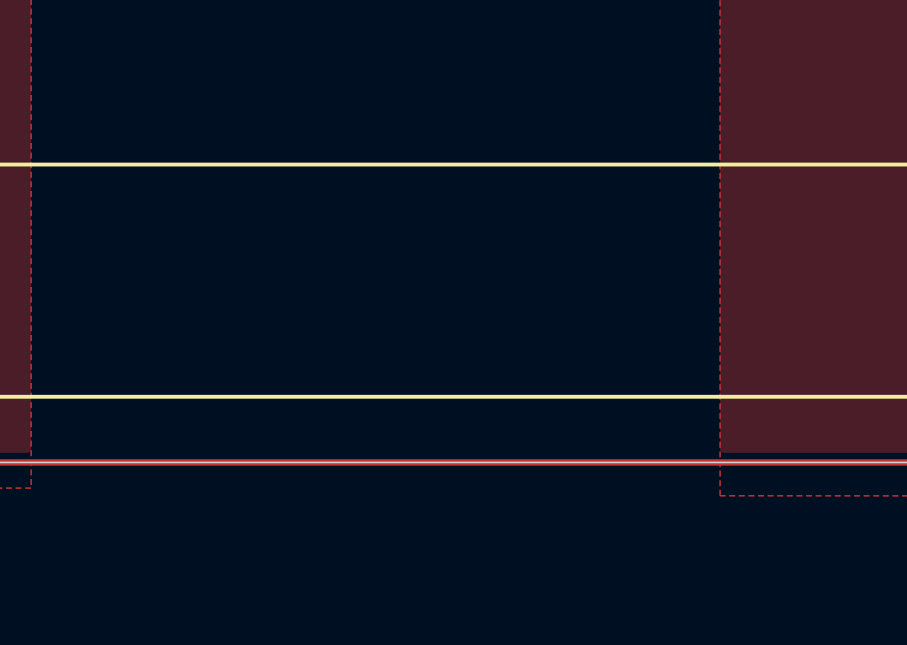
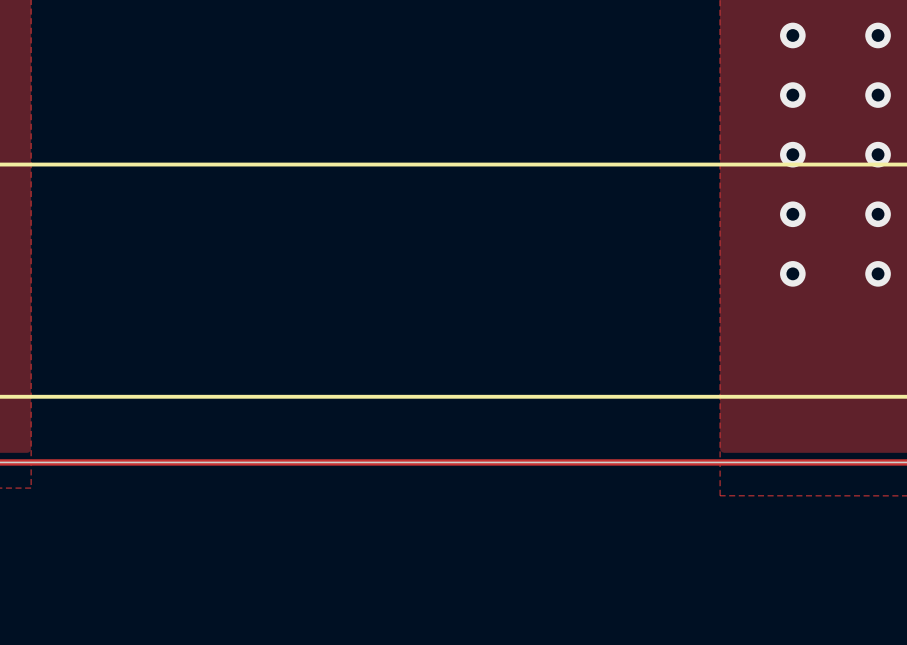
via: none -> (792, 35)
via: none -> (878, 35)
via: none -> (792, 95)
via: none -> (878, 95)
via: none -> (792, 154)
via: none -> (878, 154)
via: none -> (792, 214)
via: none -> (878, 214)
via: none -> (792, 273)
via: none -> (878, 273)

